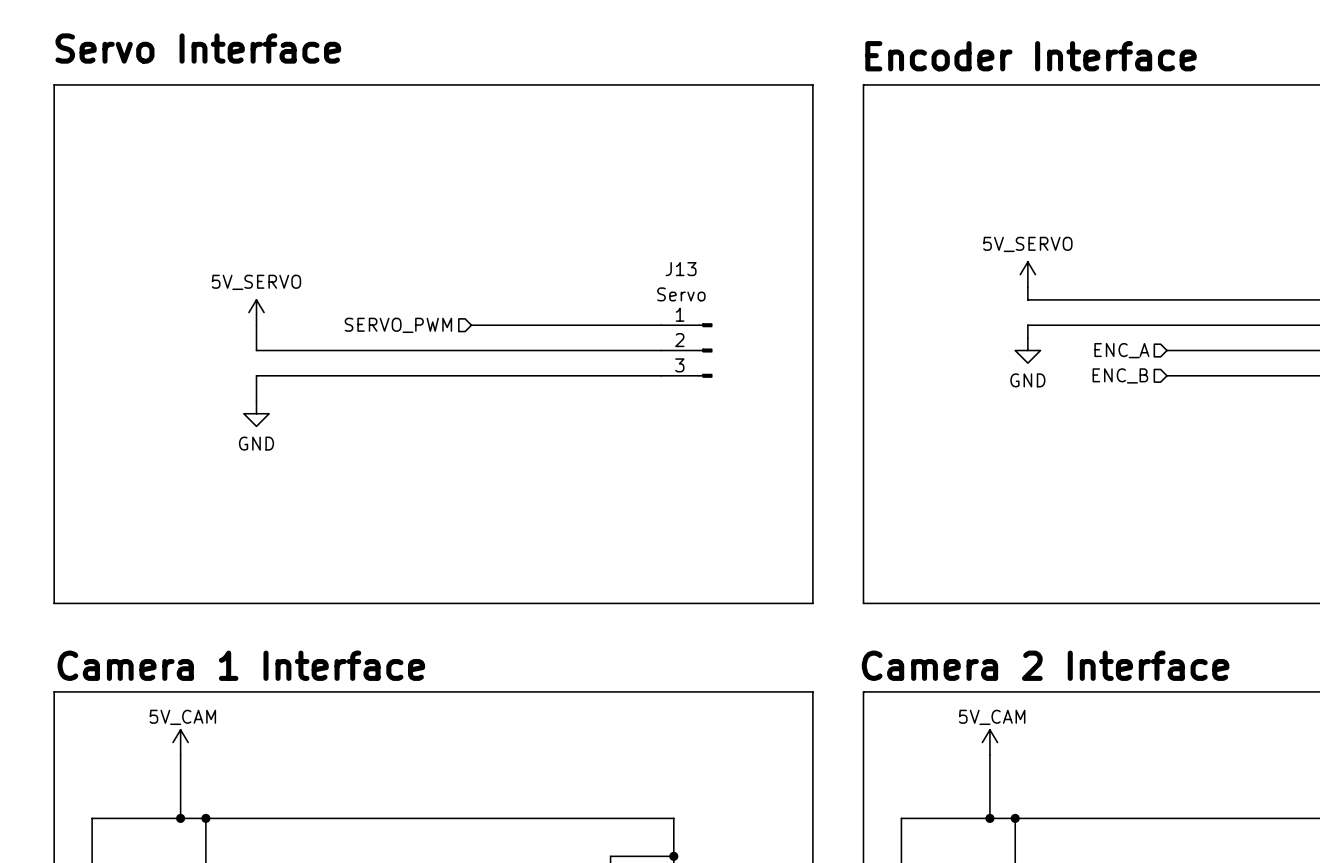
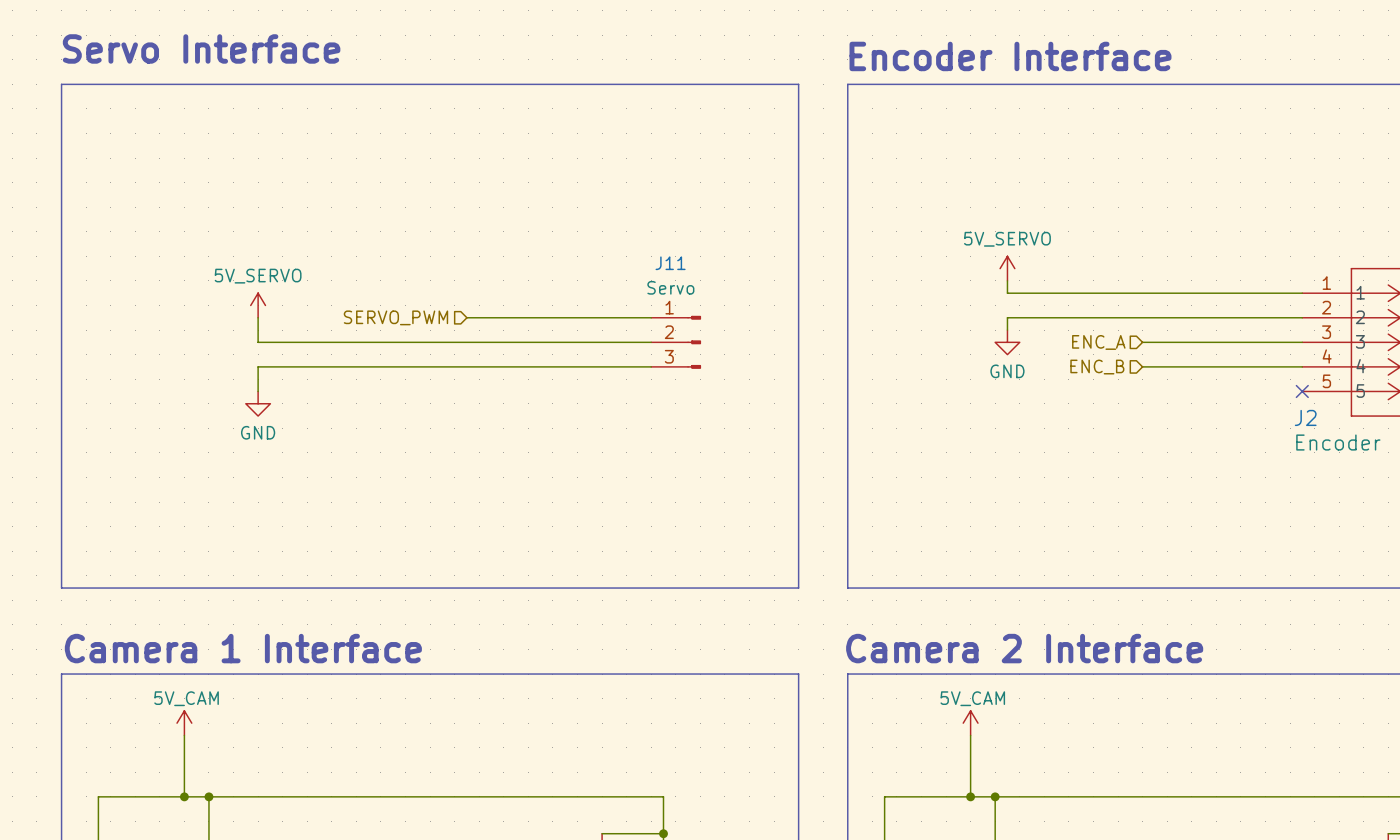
J13 name: J13 (681, 269) -> J11 (670, 263)

